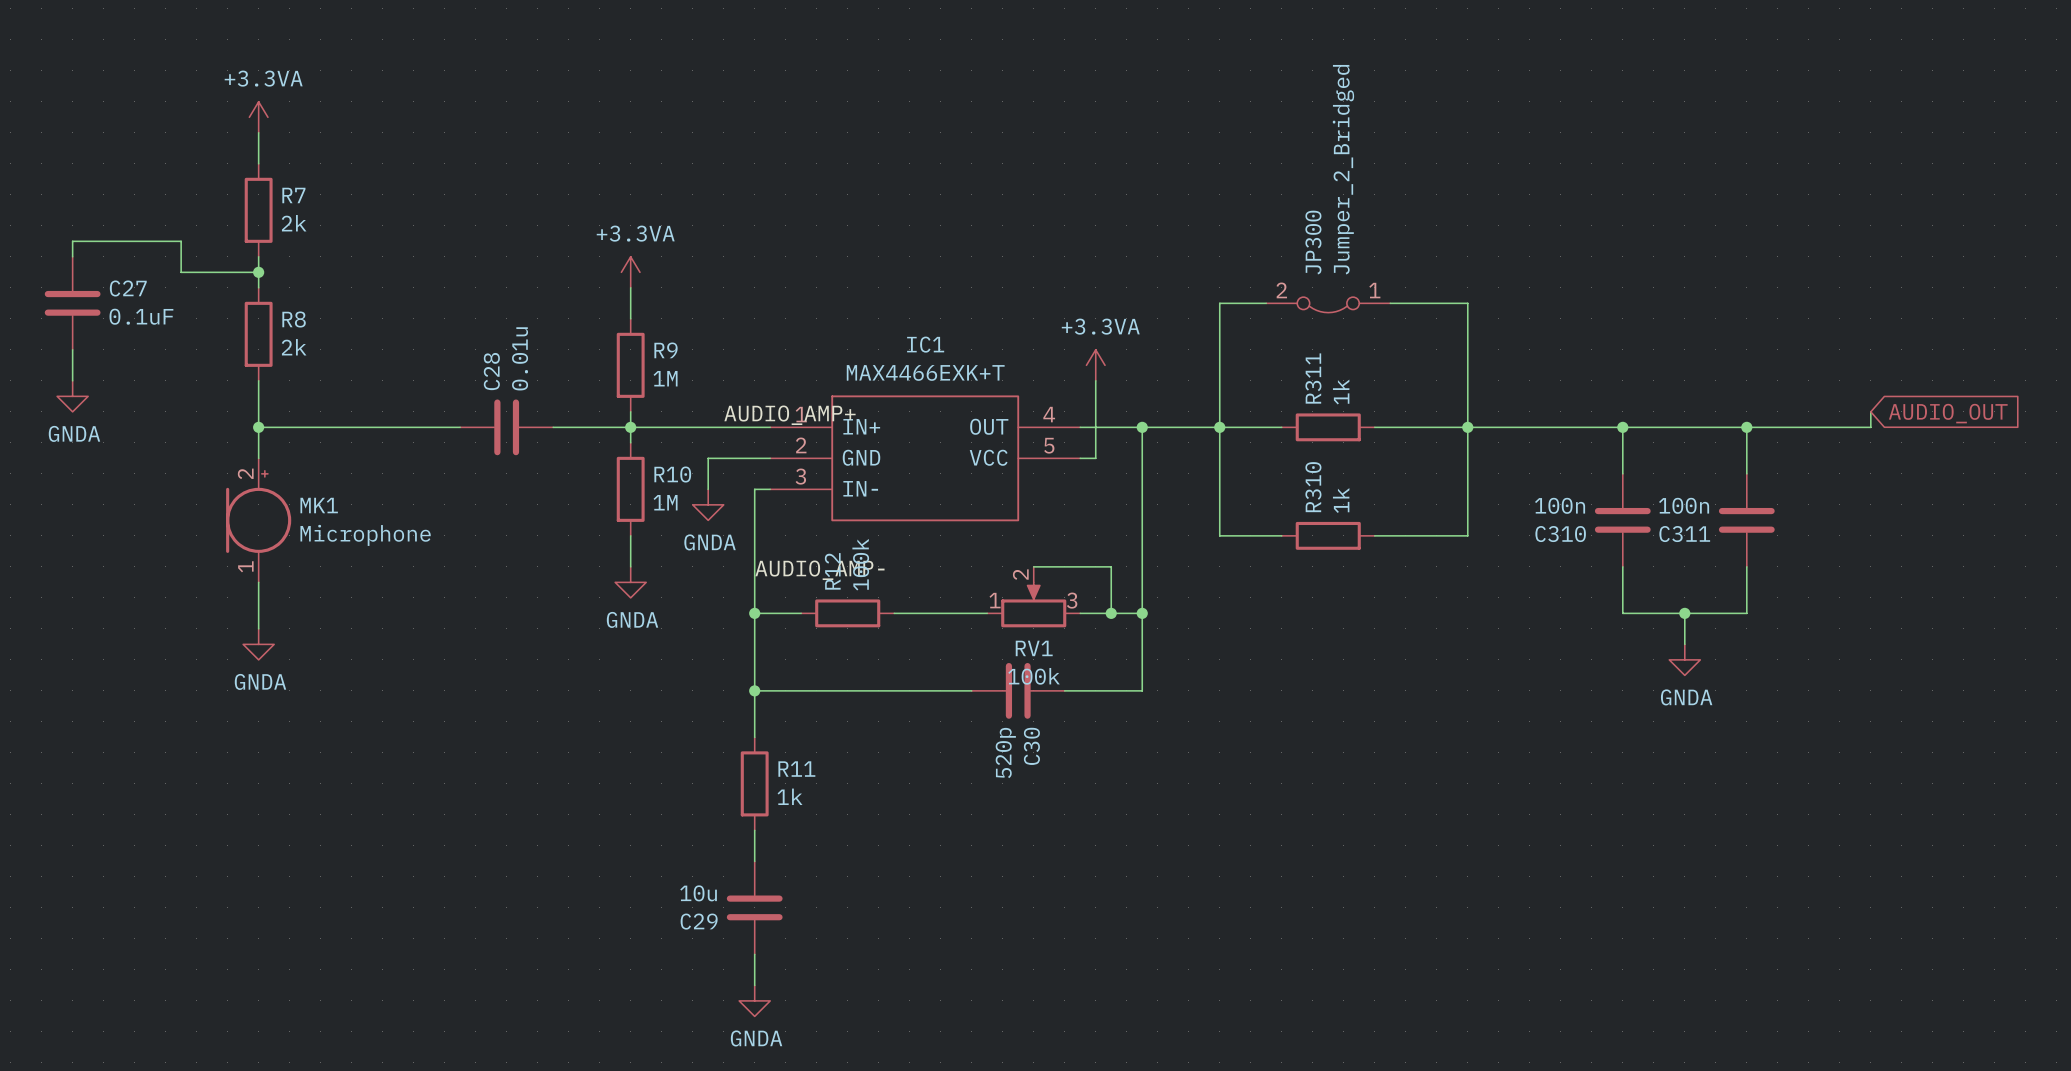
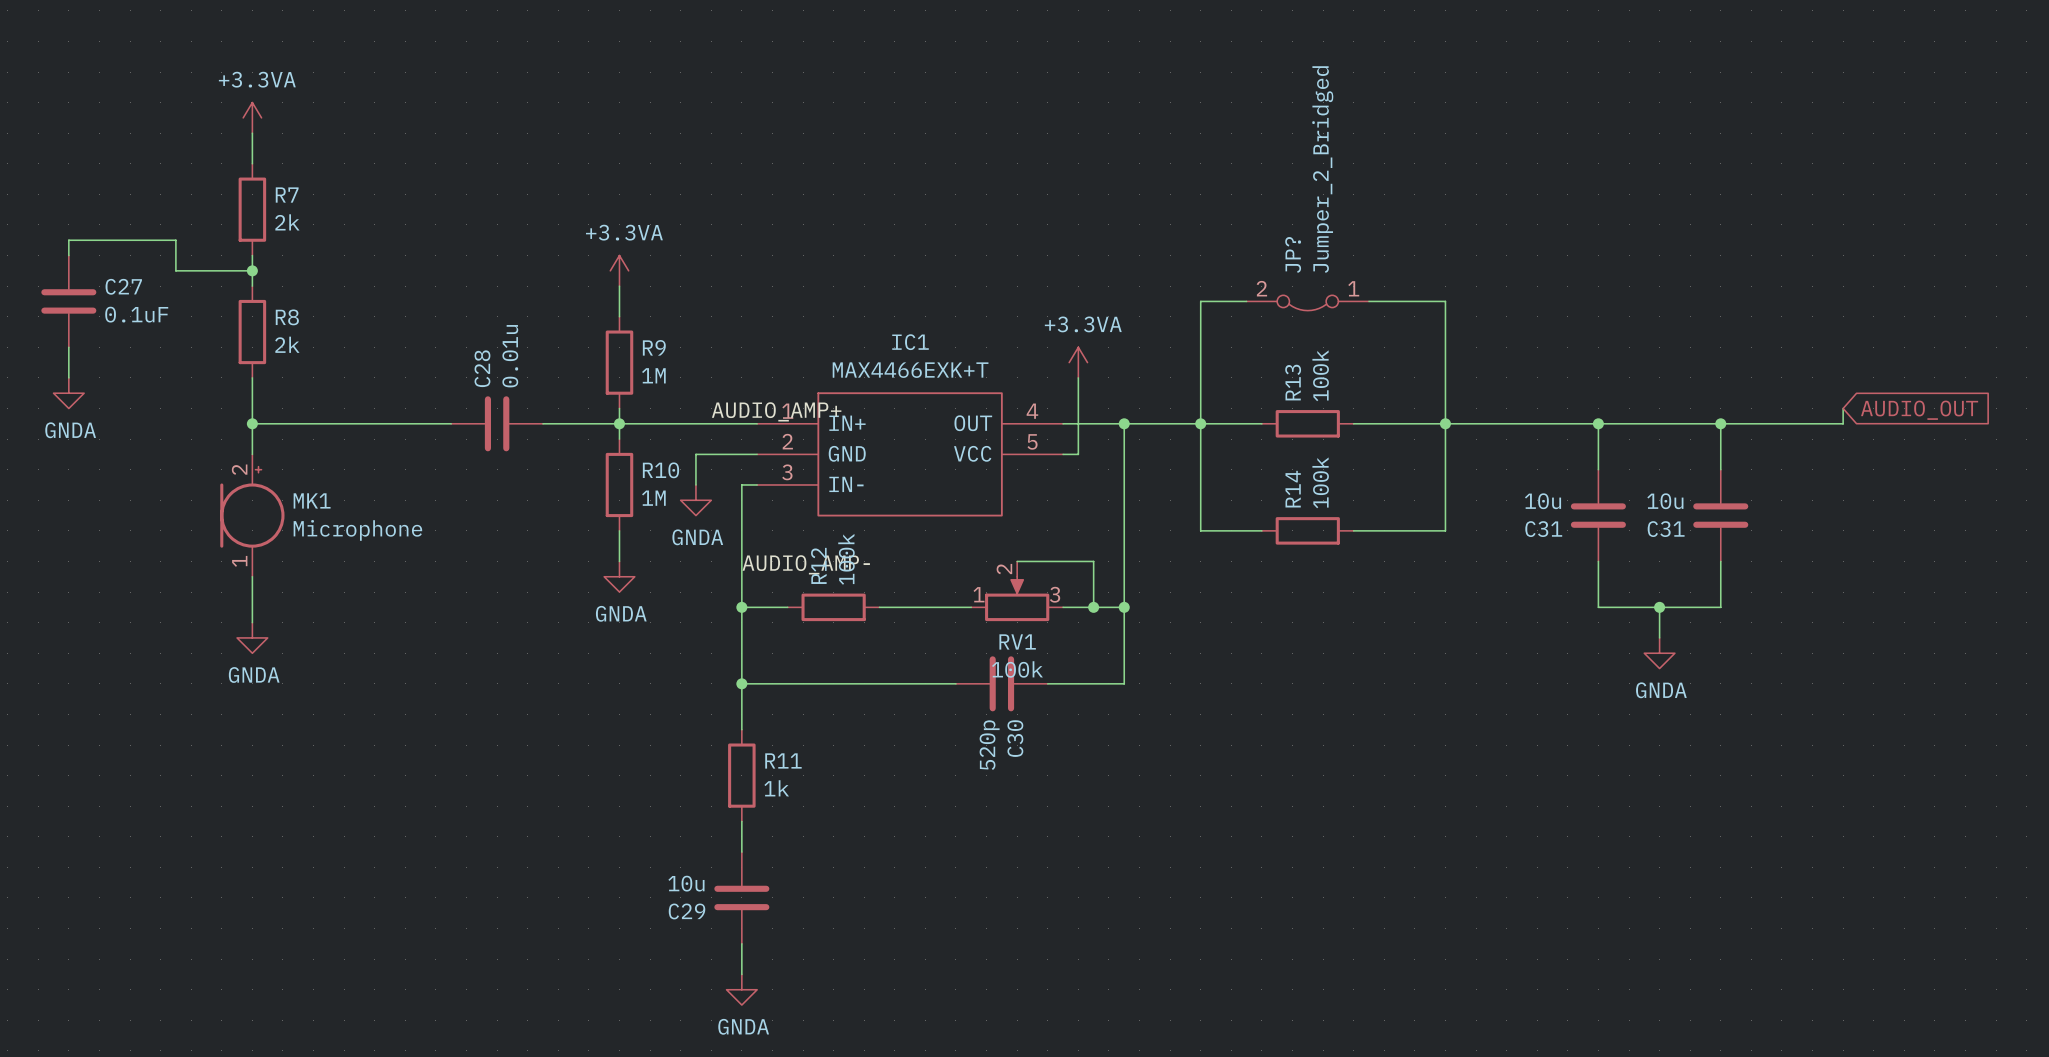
JP300 name: JP300 (1313, 242) -> JP? (1293, 254)
R311 name: R311 (1313, 378) -> R13 (1293, 382)
R311 value: 1k (1341, 392) -> 100k (1320, 375)
R310 name: R310 (1313, 487) -> R14 (1293, 489)
R310 value: 1k (1341, 500) -> 100k (1320, 482)
C310 value: 100n (1560, 505) -> 10u (1543, 501)
C311 value: 100n (1684, 505) -> 10u (1665, 501)
C310 name: C310 (1560, 534) -> C31 (1543, 529)
C311 name: C311 (1684, 534) -> C31 (1666, 529)

